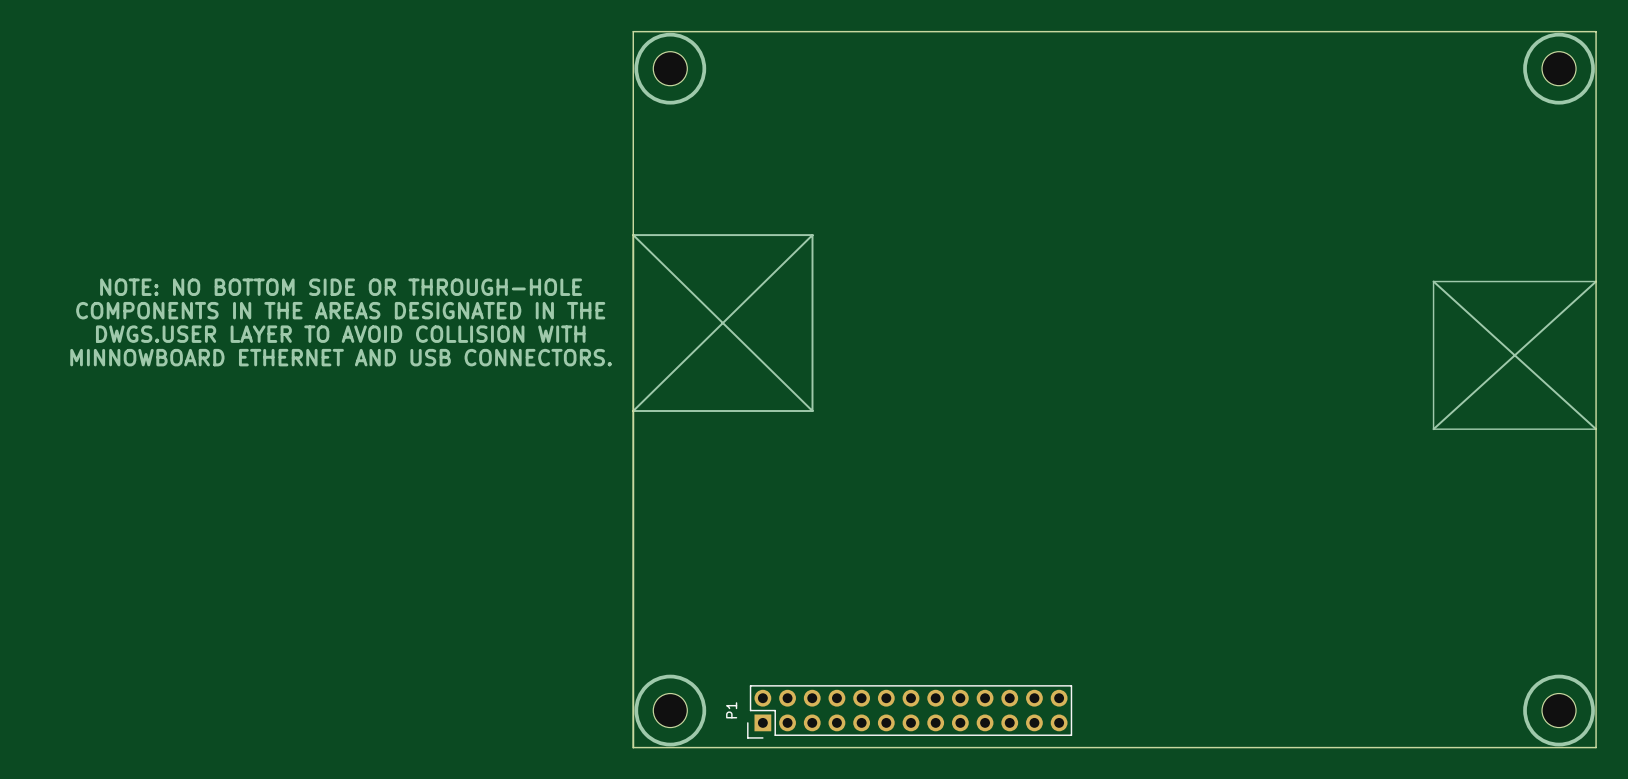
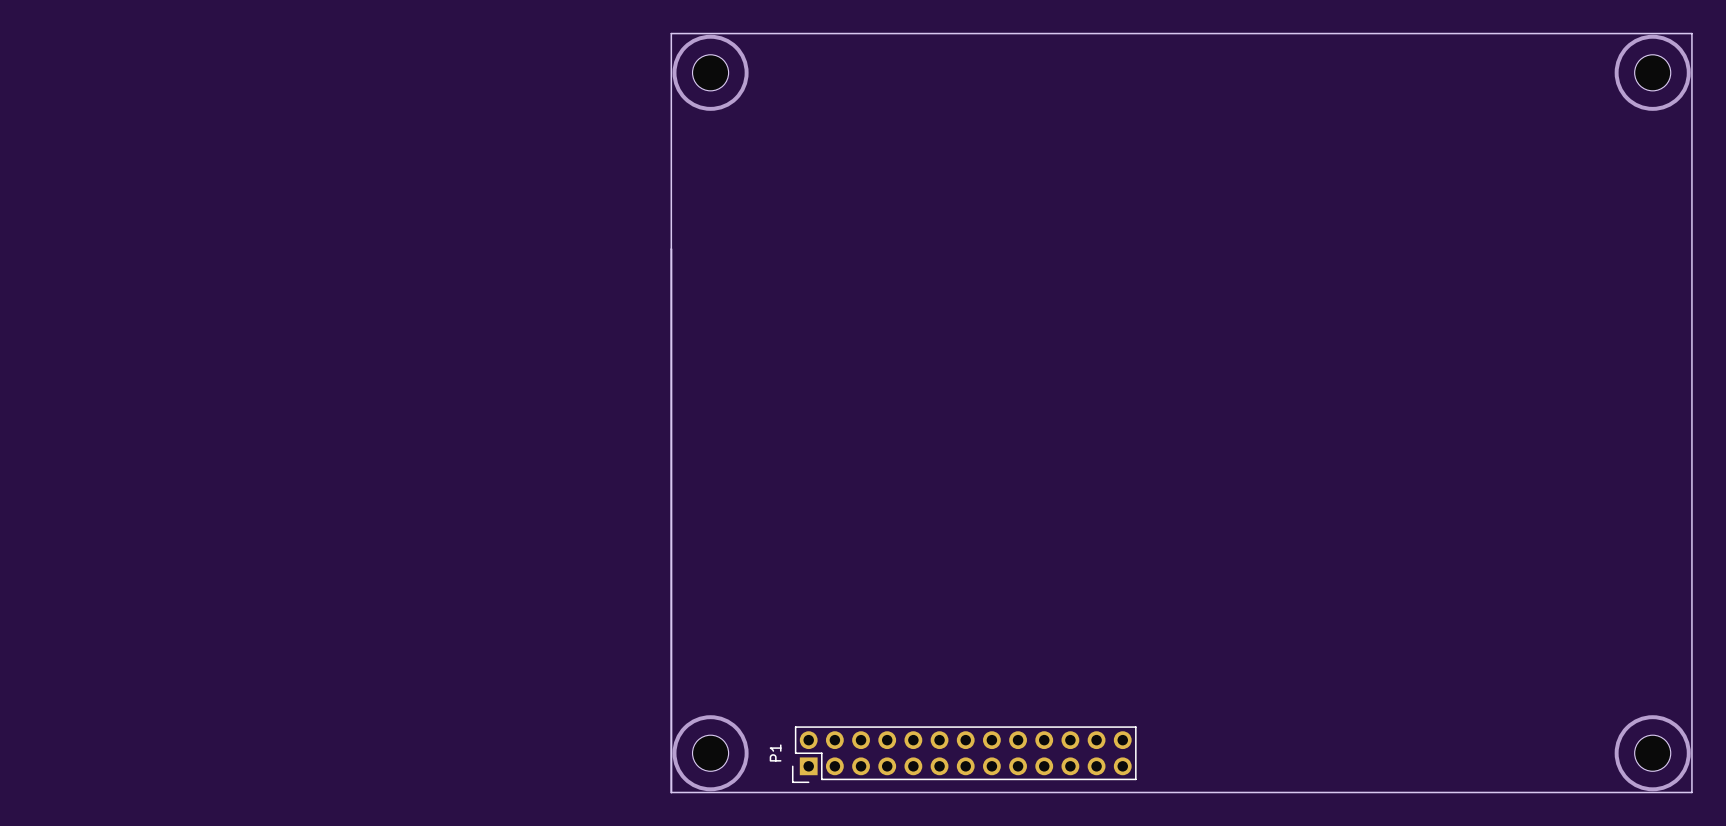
line: (812, 235) (633, 411) (812, 411) -> none
line: (812, 235) (812, 411) -> none
line: (812, 235) (633, 235) (812, 411) -> none
line: (1433, 281) (1596, 429) (1433, 429) -> none
line: (1433, 281) (1433, 429) -> none
line: (1433, 281) (1596, 281) (1433, 429) -> none
text: NOTE: NO BOTTOM SIDE OR THROUGH-HOLE (341, 287) -> none
text: COMPONENTS IN THE AREAS DESIGNATED IN THE (340, 310) -> none
text: DWGS.USER LAYER TO AVOID COLLISION WITH (340, 334) -> none
text: MINNOWBOARD ETHERNET AND USB CONNECTORS. (341, 357) -> none

